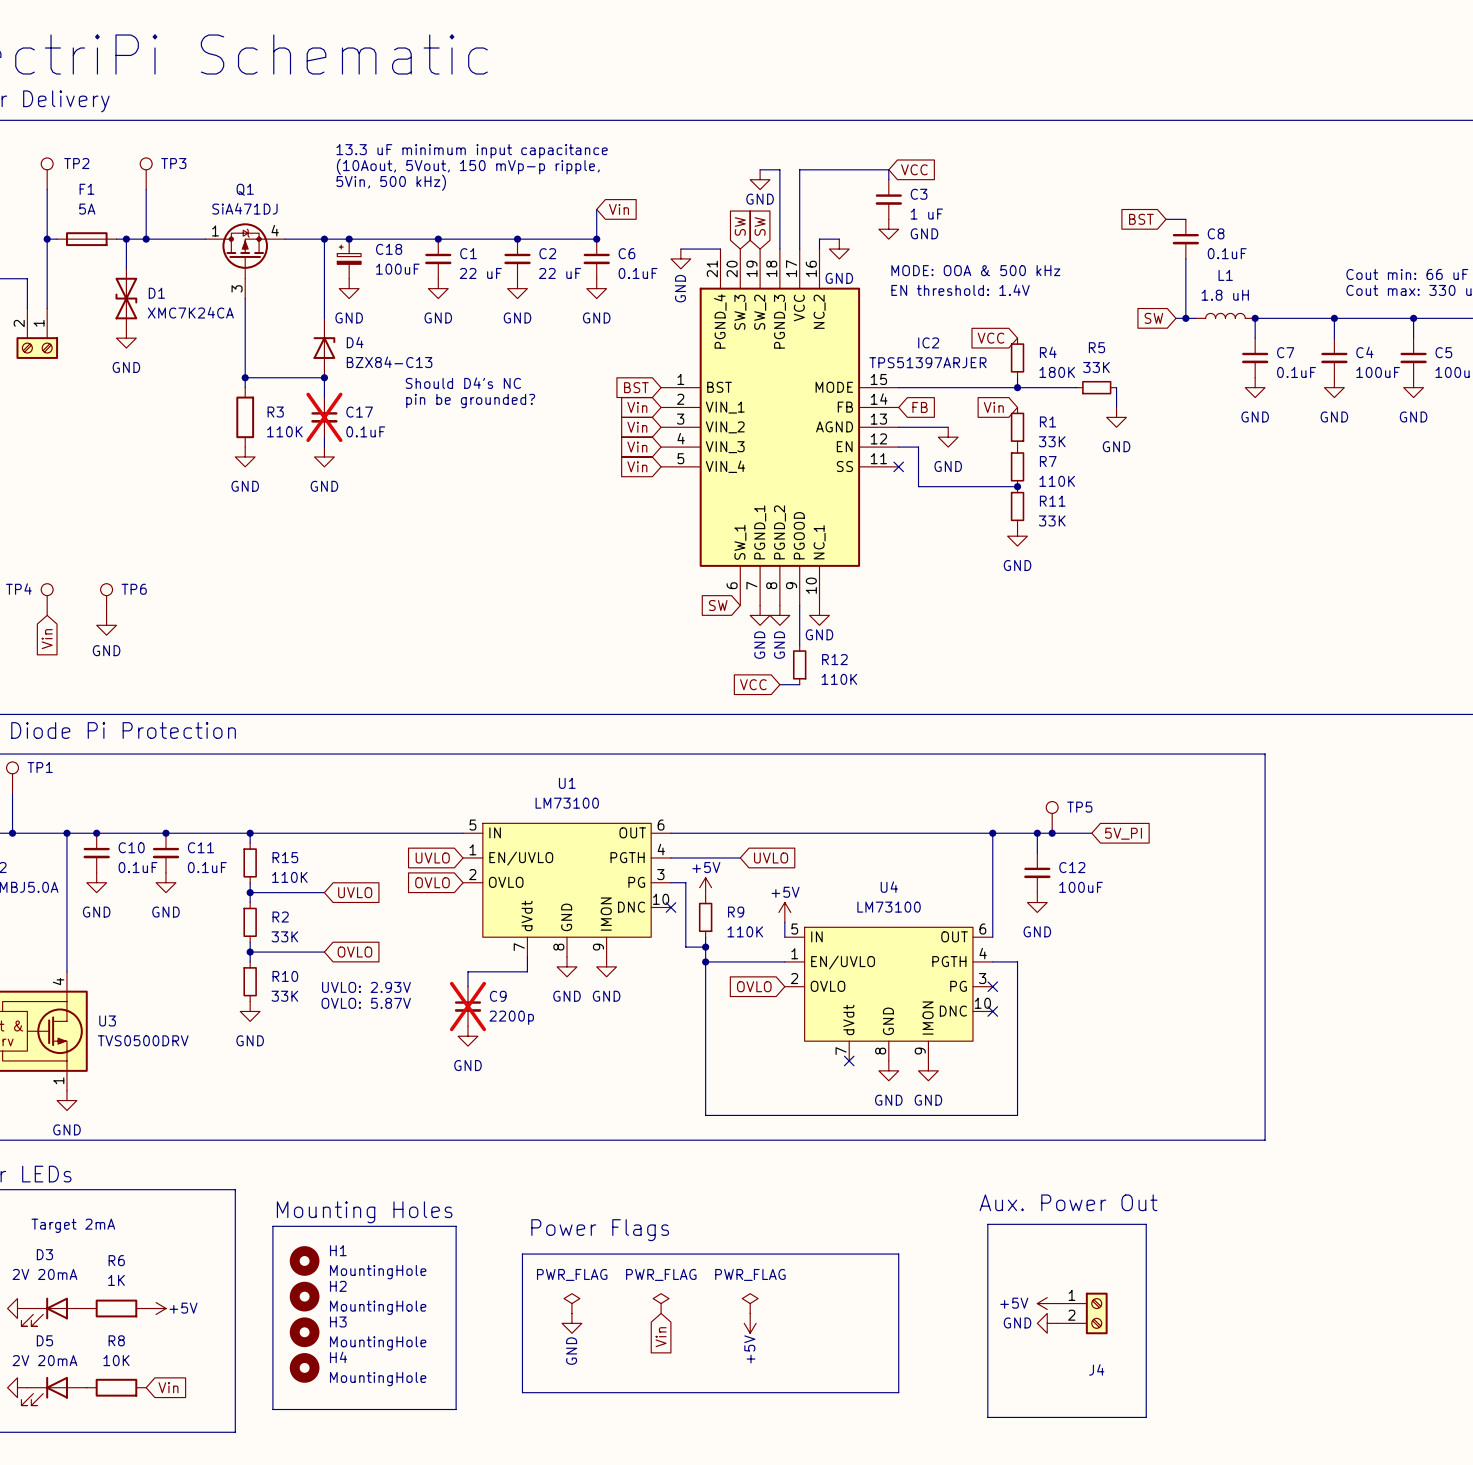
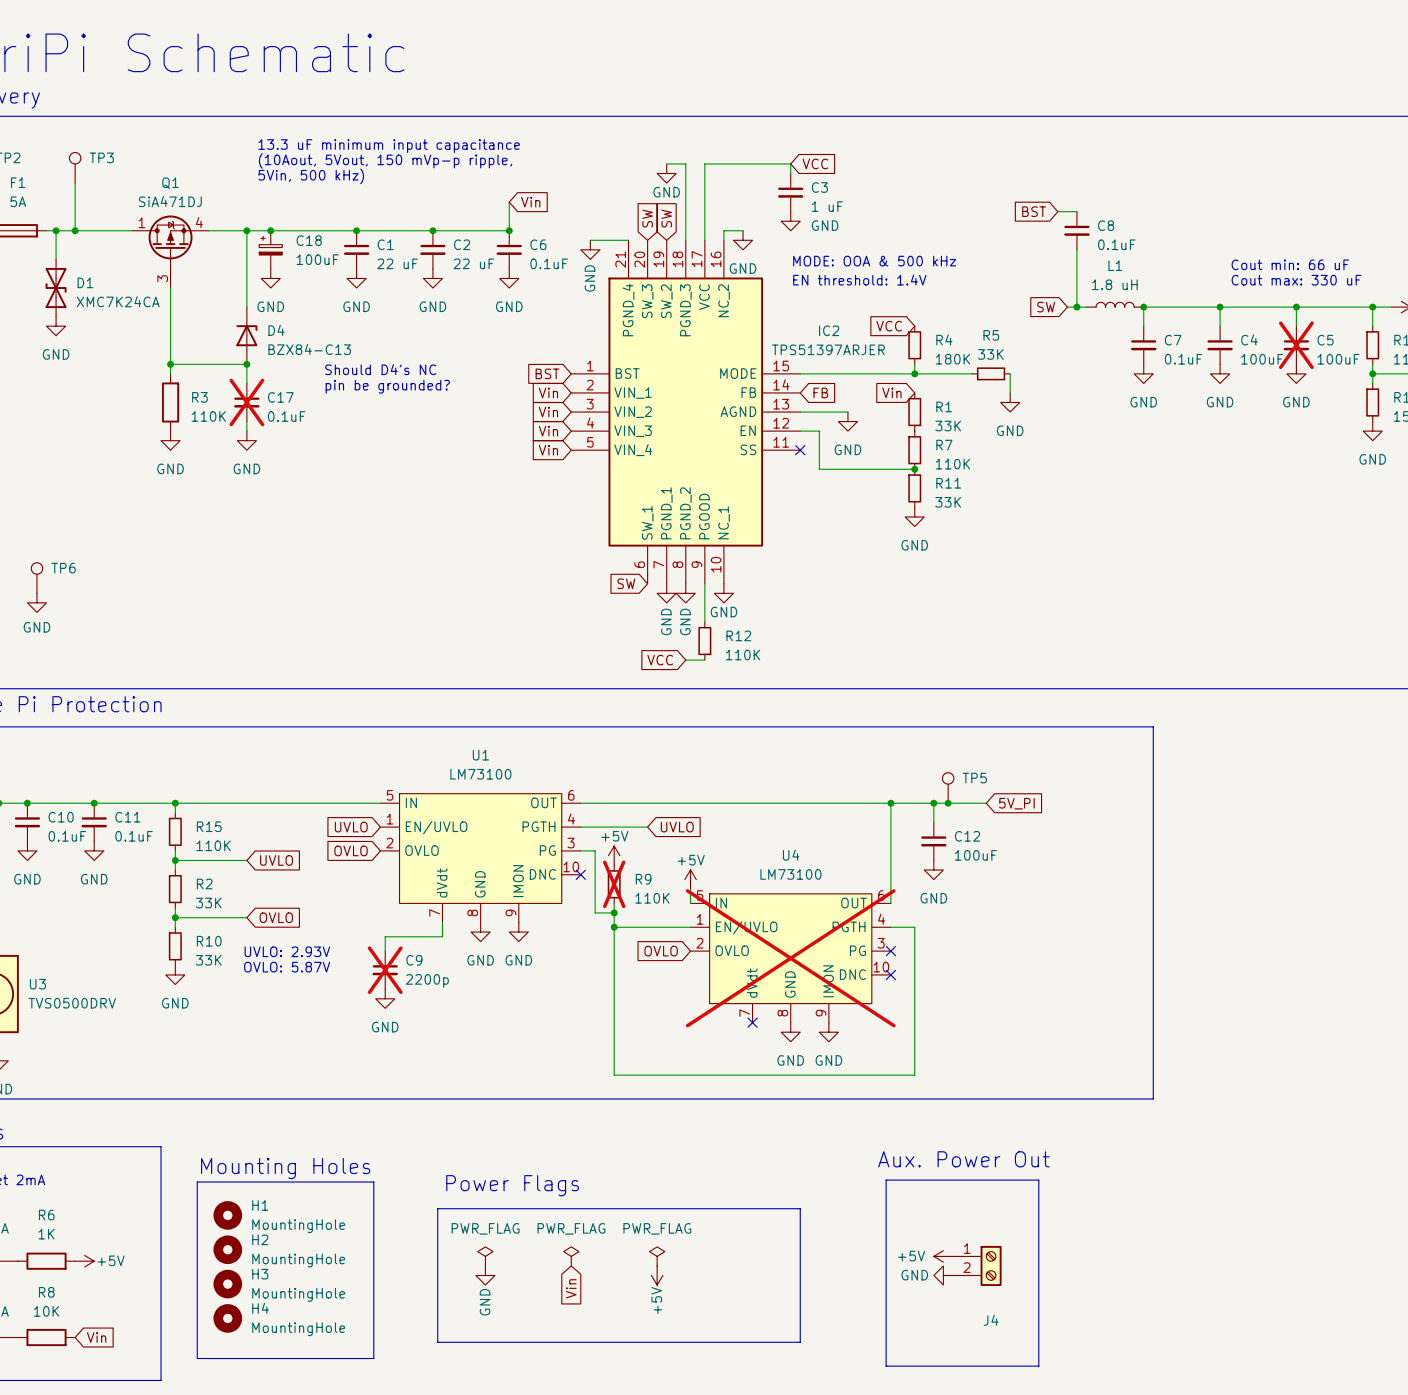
C5 do-not-place cross: none -> (1296, 345)
R9 do-not-place cross: none -> (614, 884)
U4 do-not-place cross: none -> (790, 958)

